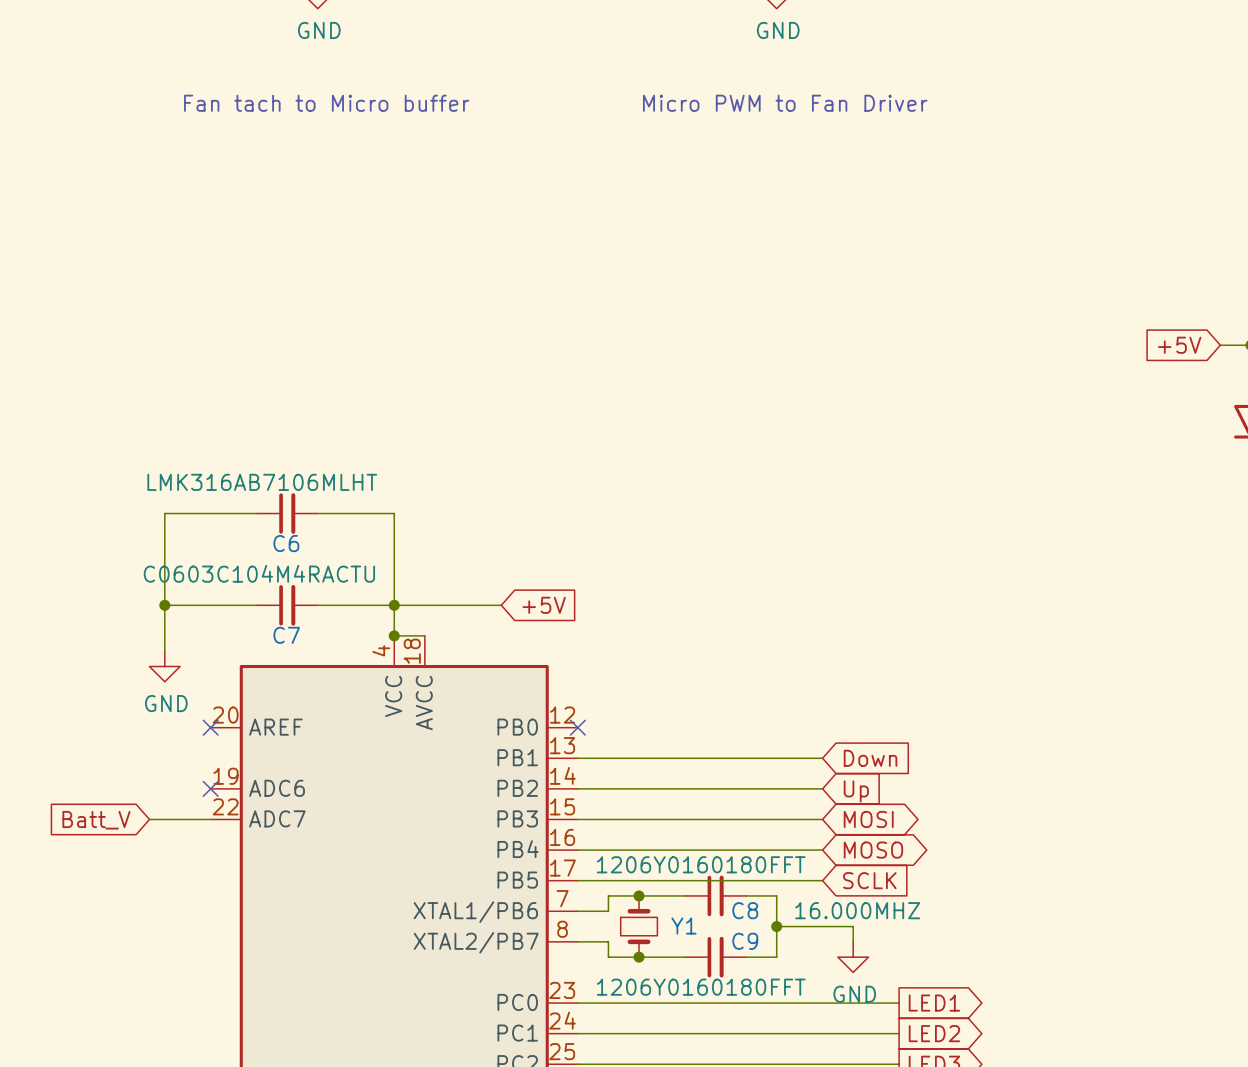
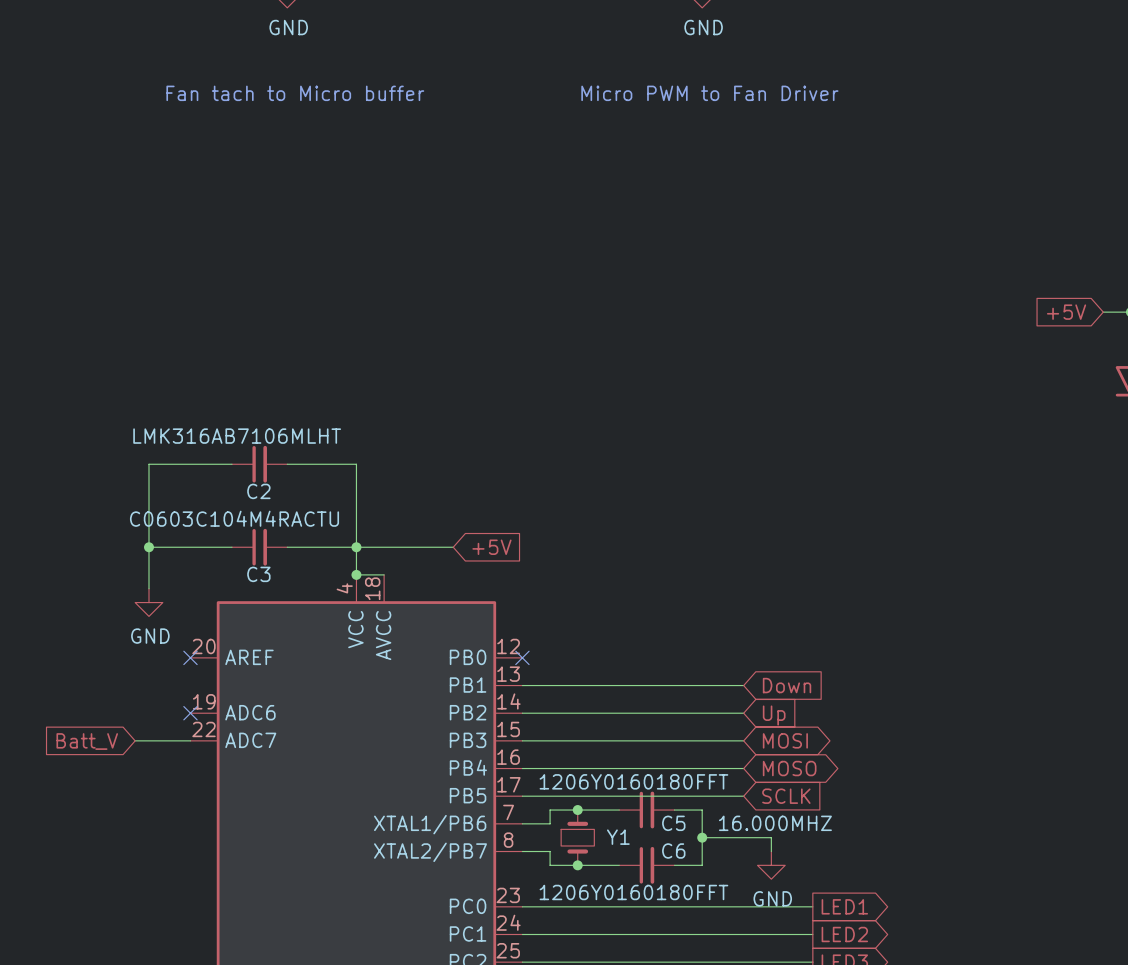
C6 name: C6 (286, 543) -> C2 (258, 491)
C7 name: C7 (286, 635) -> C3 (258, 574)
C8 name: C8 (745, 910) -> C5 (673, 823)
C9 name: C9 (745, 941) -> C6 (673, 850)

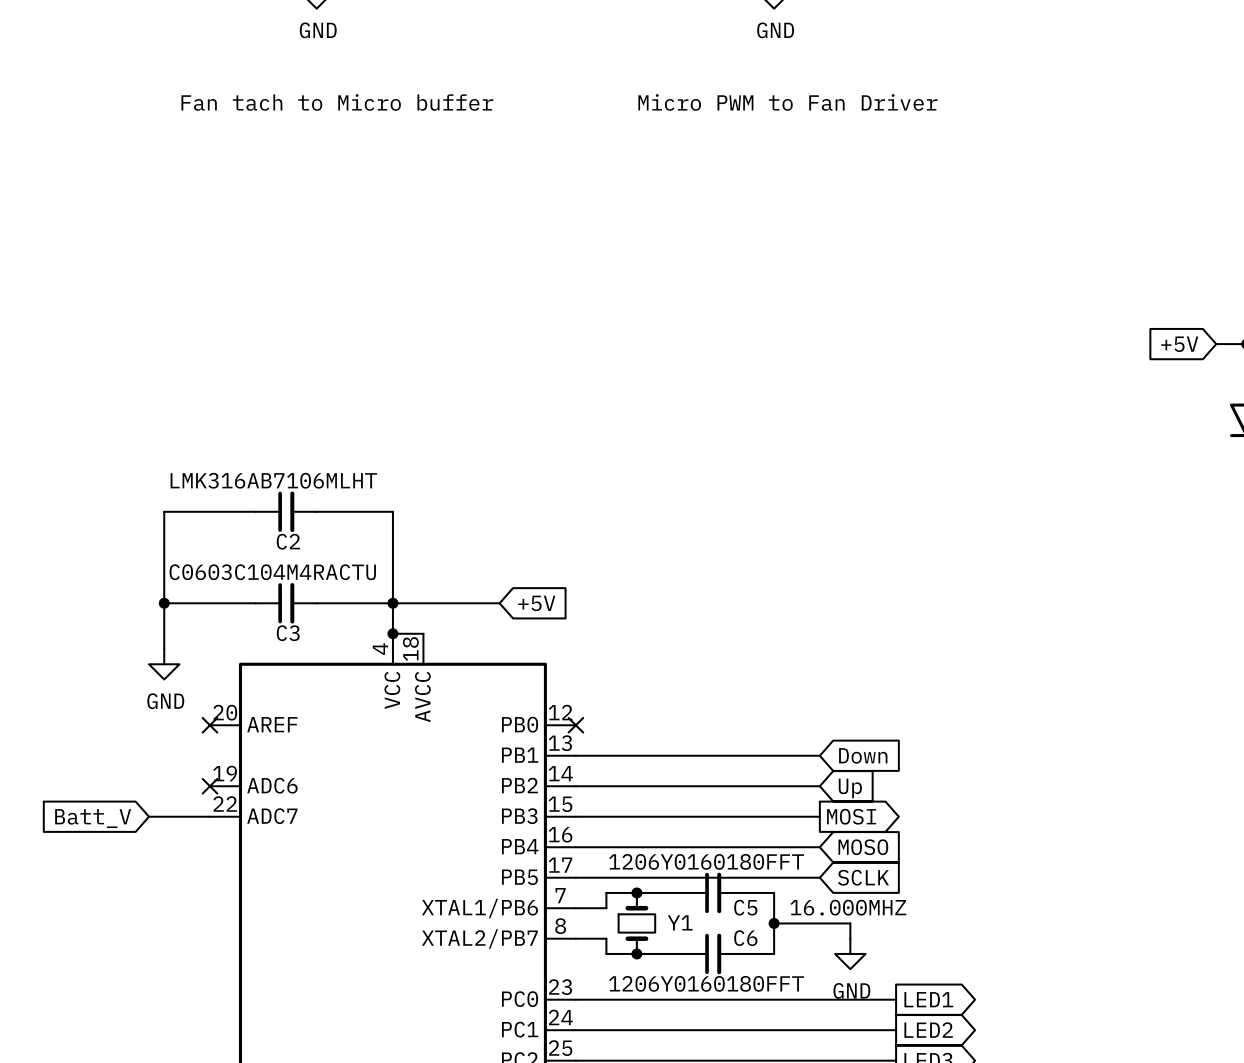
global label shape: bidirectional (785, 740) -> output (851, 816)
global label shape: bidirectional (789, 768) -> input (863, 847)

